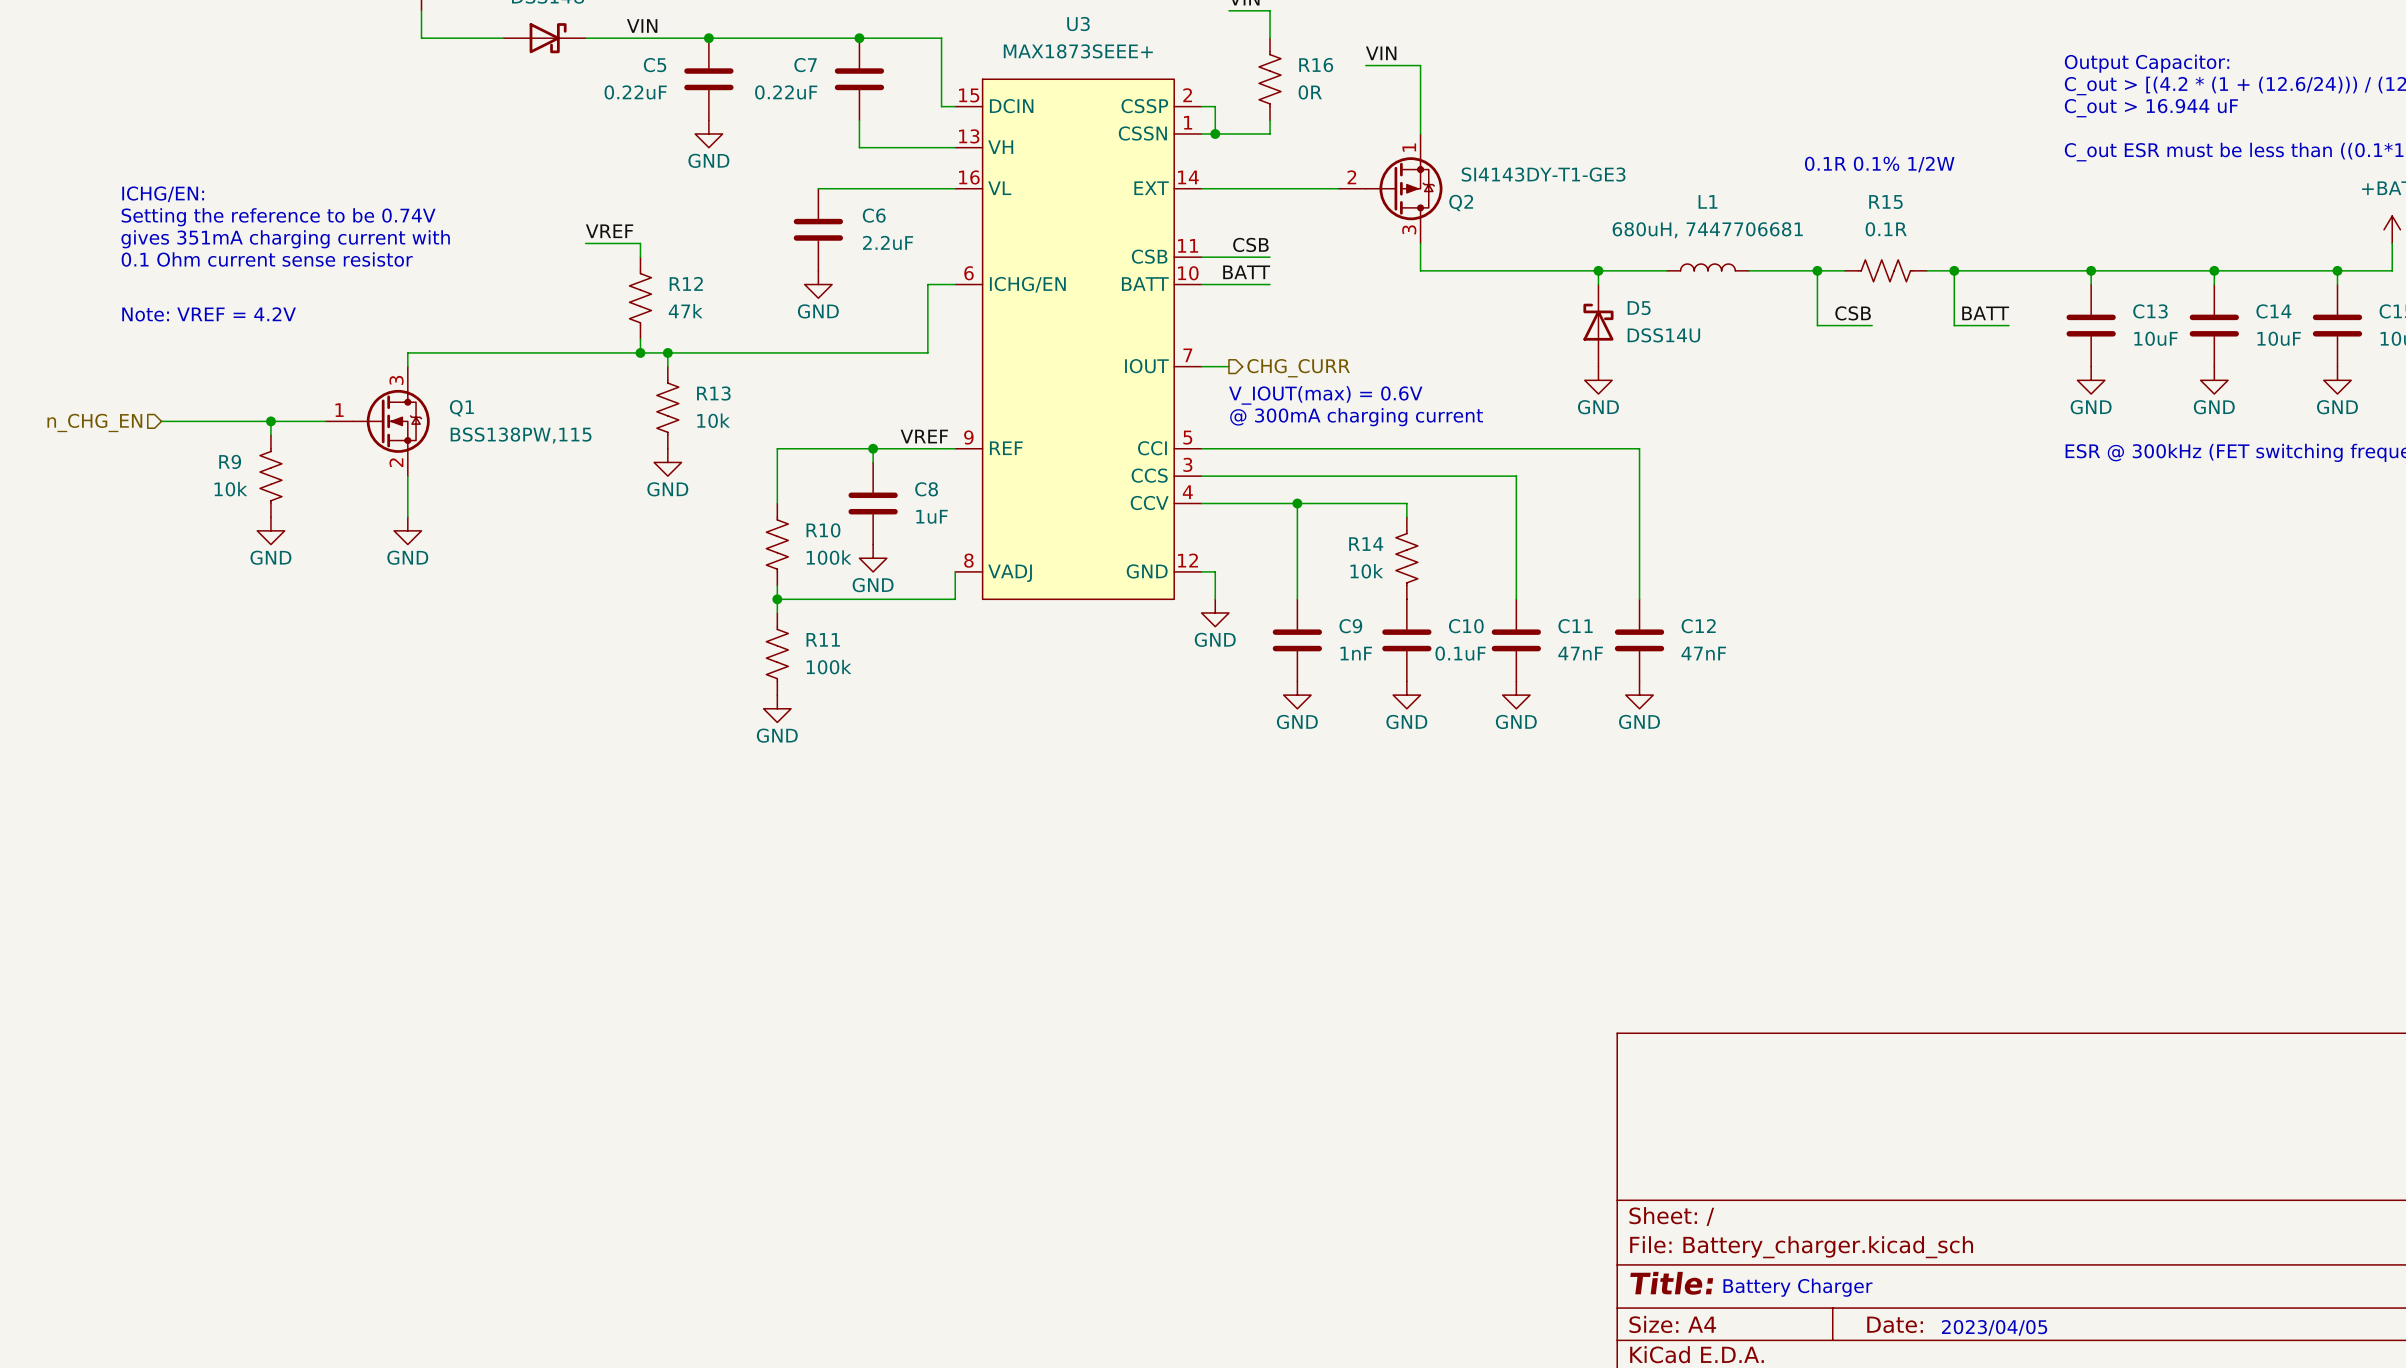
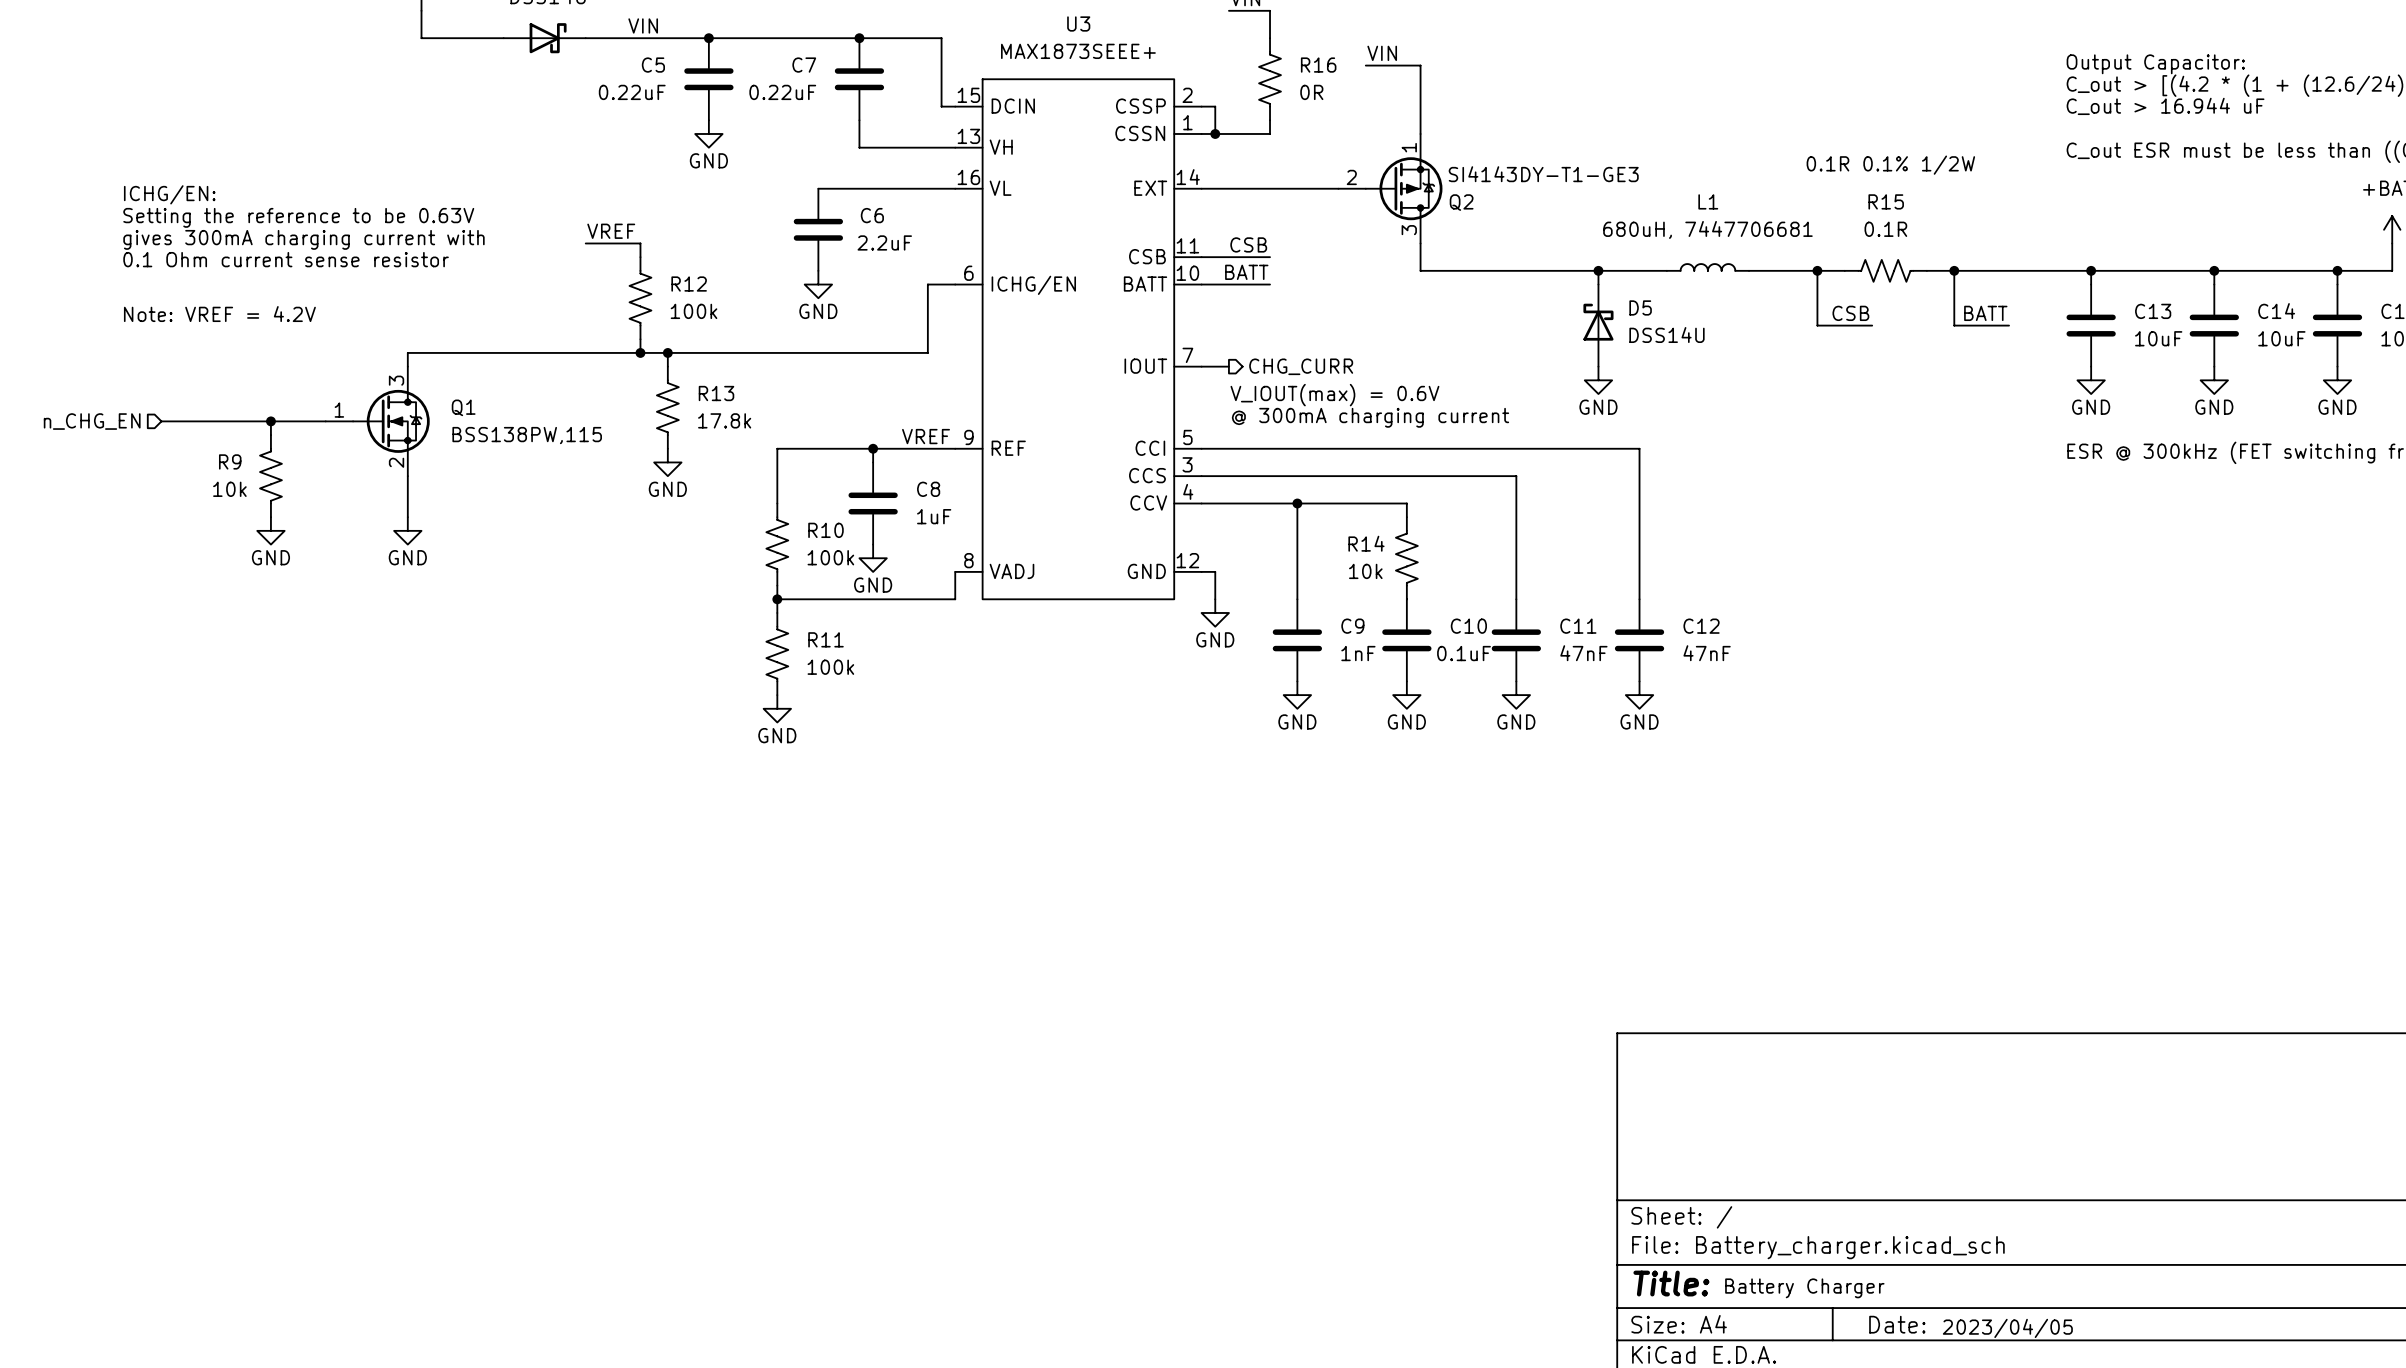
text: Setting the reference to be 0.74V (278, 217) -> Setting the reference to be 0.63V (298, 217)
text: gives 351mA charging current with (285, 239) -> gives 300mA charging current with (303, 239)
R12 value: 47k (685, 311) -> 100k (694, 311)
R13 value: 10k (713, 420) -> 17.8k (724, 420)

